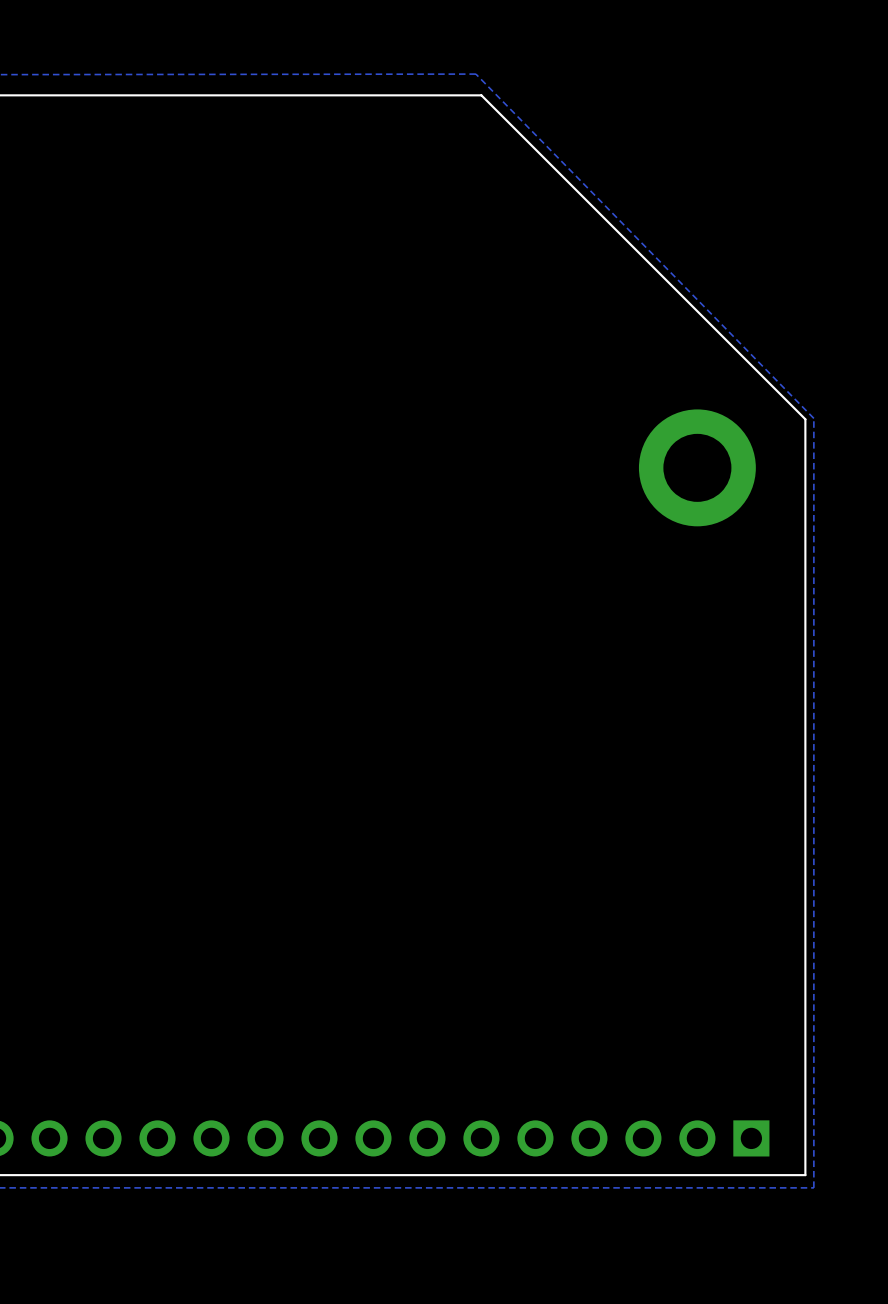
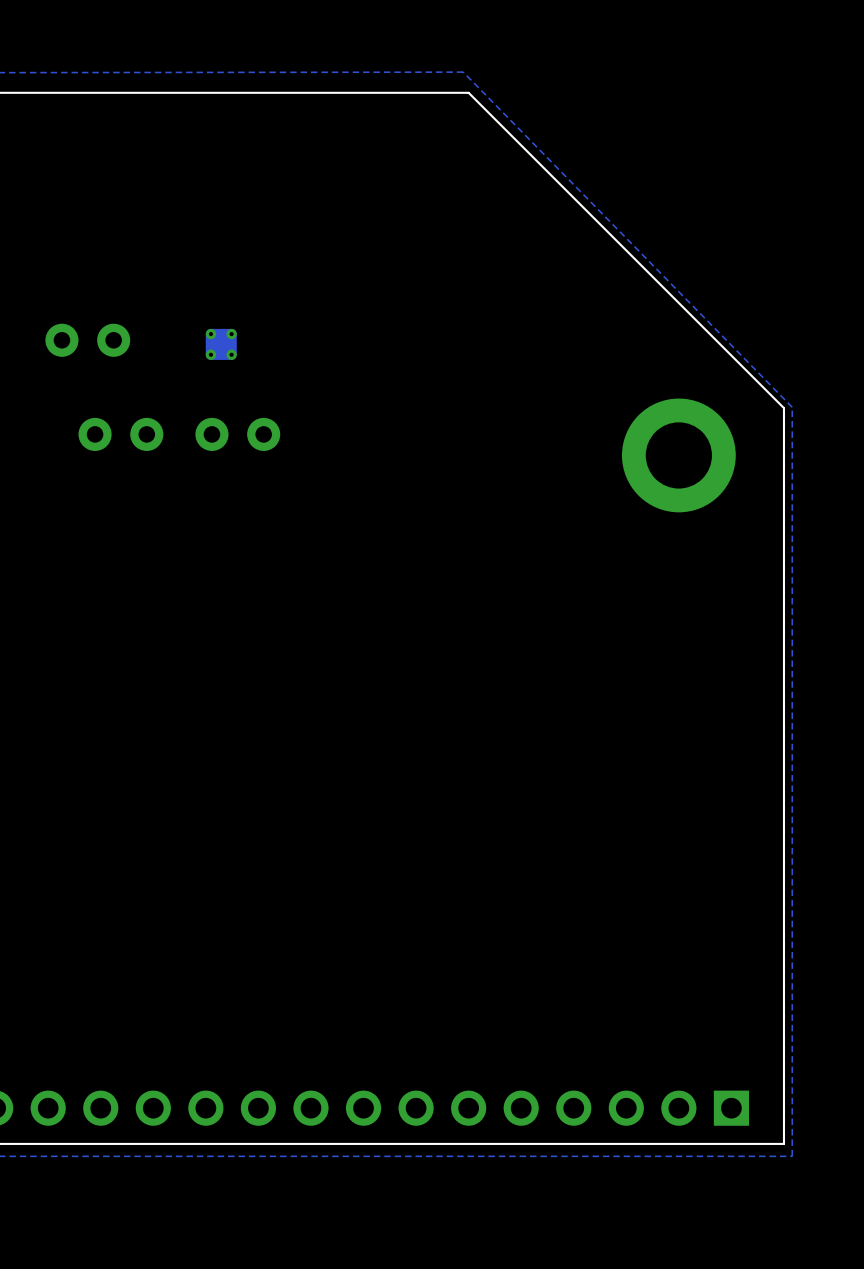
part: none -> (87, 340)
part: none -> (221, 344)
part: none -> (120, 434)
part: none -> (237, 434)

